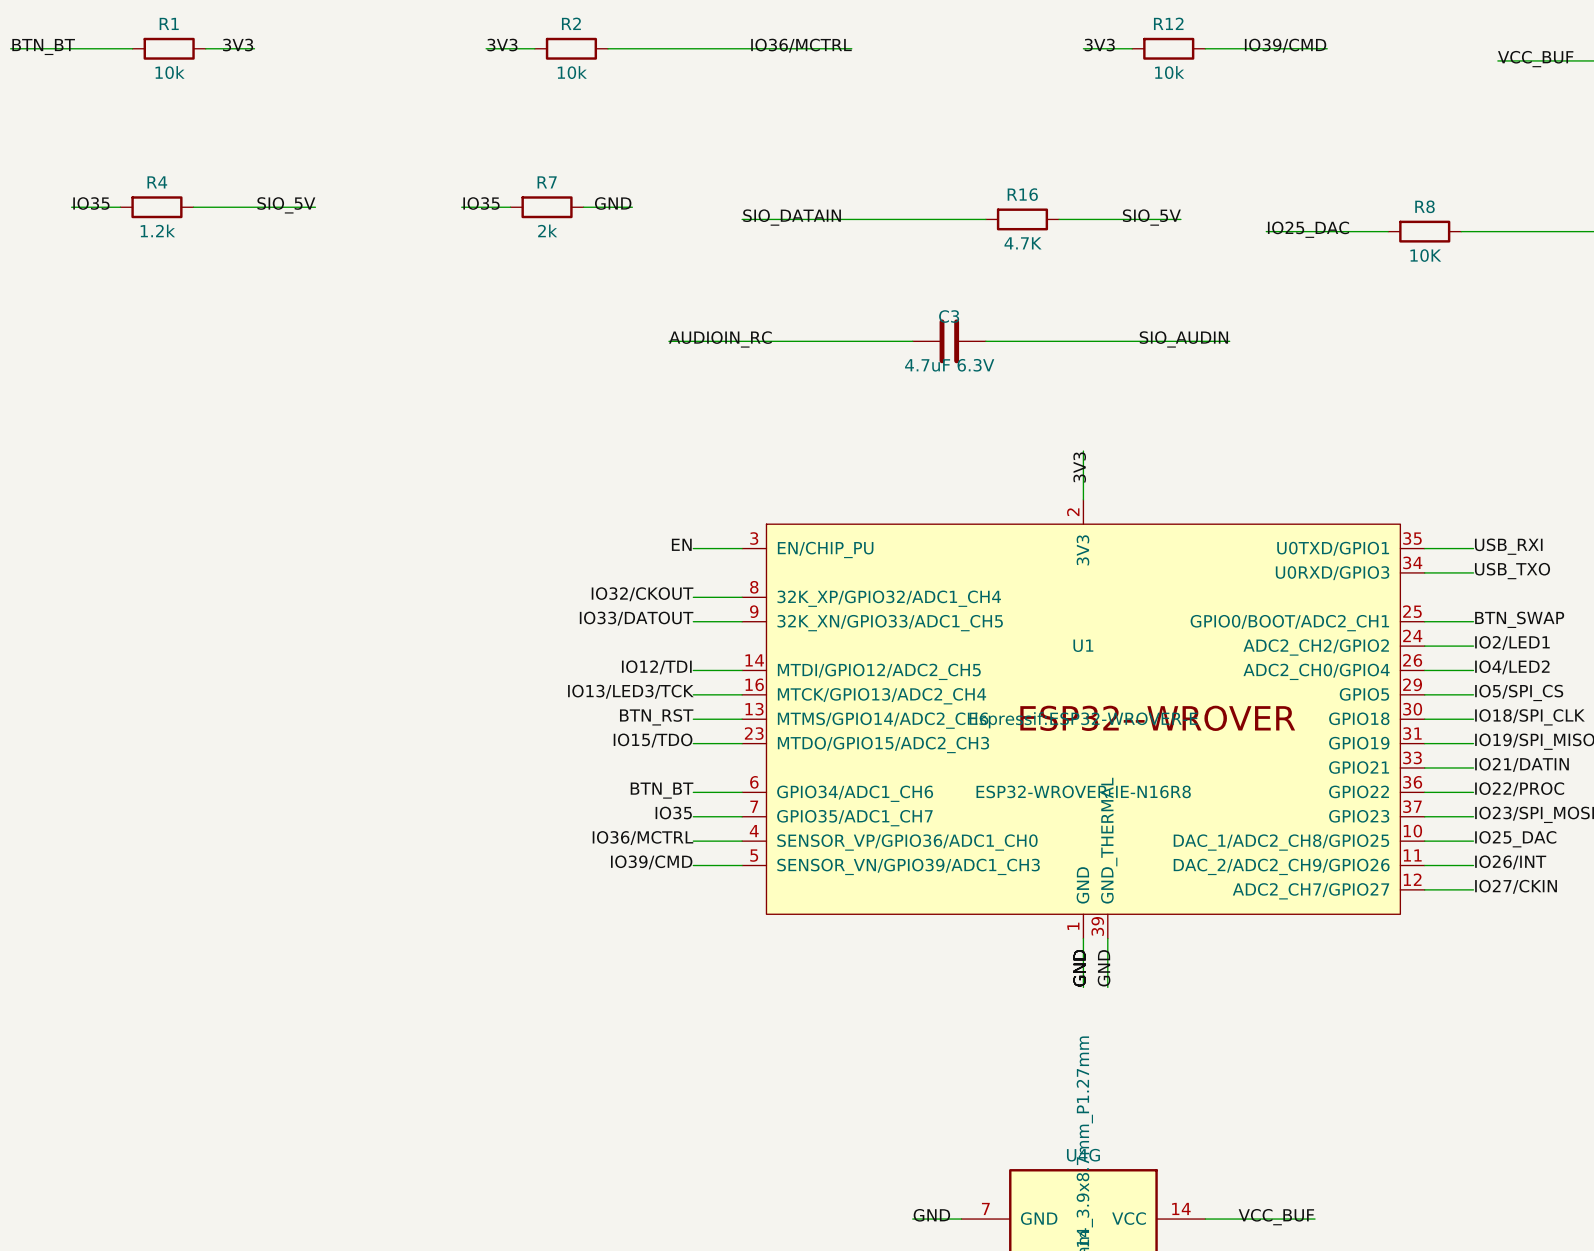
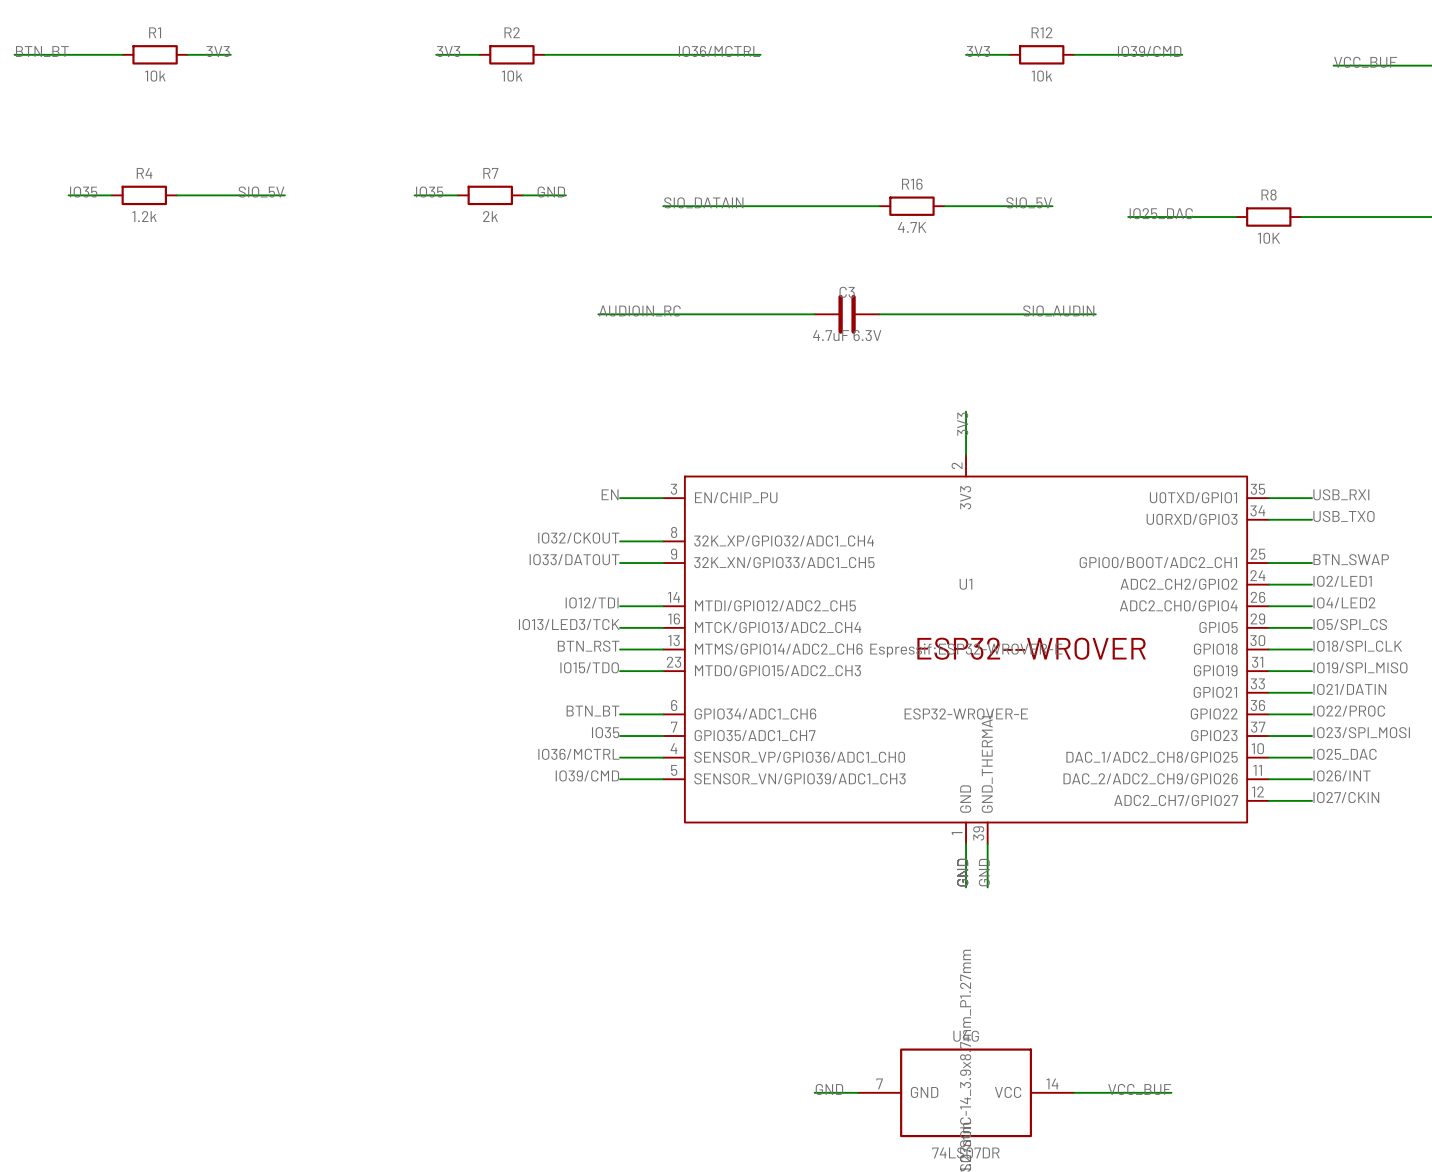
U1 value: ESP32-WROVER-IE-N16R8 (1083, 791) -> ESP32-WROVER-E (966, 713)

